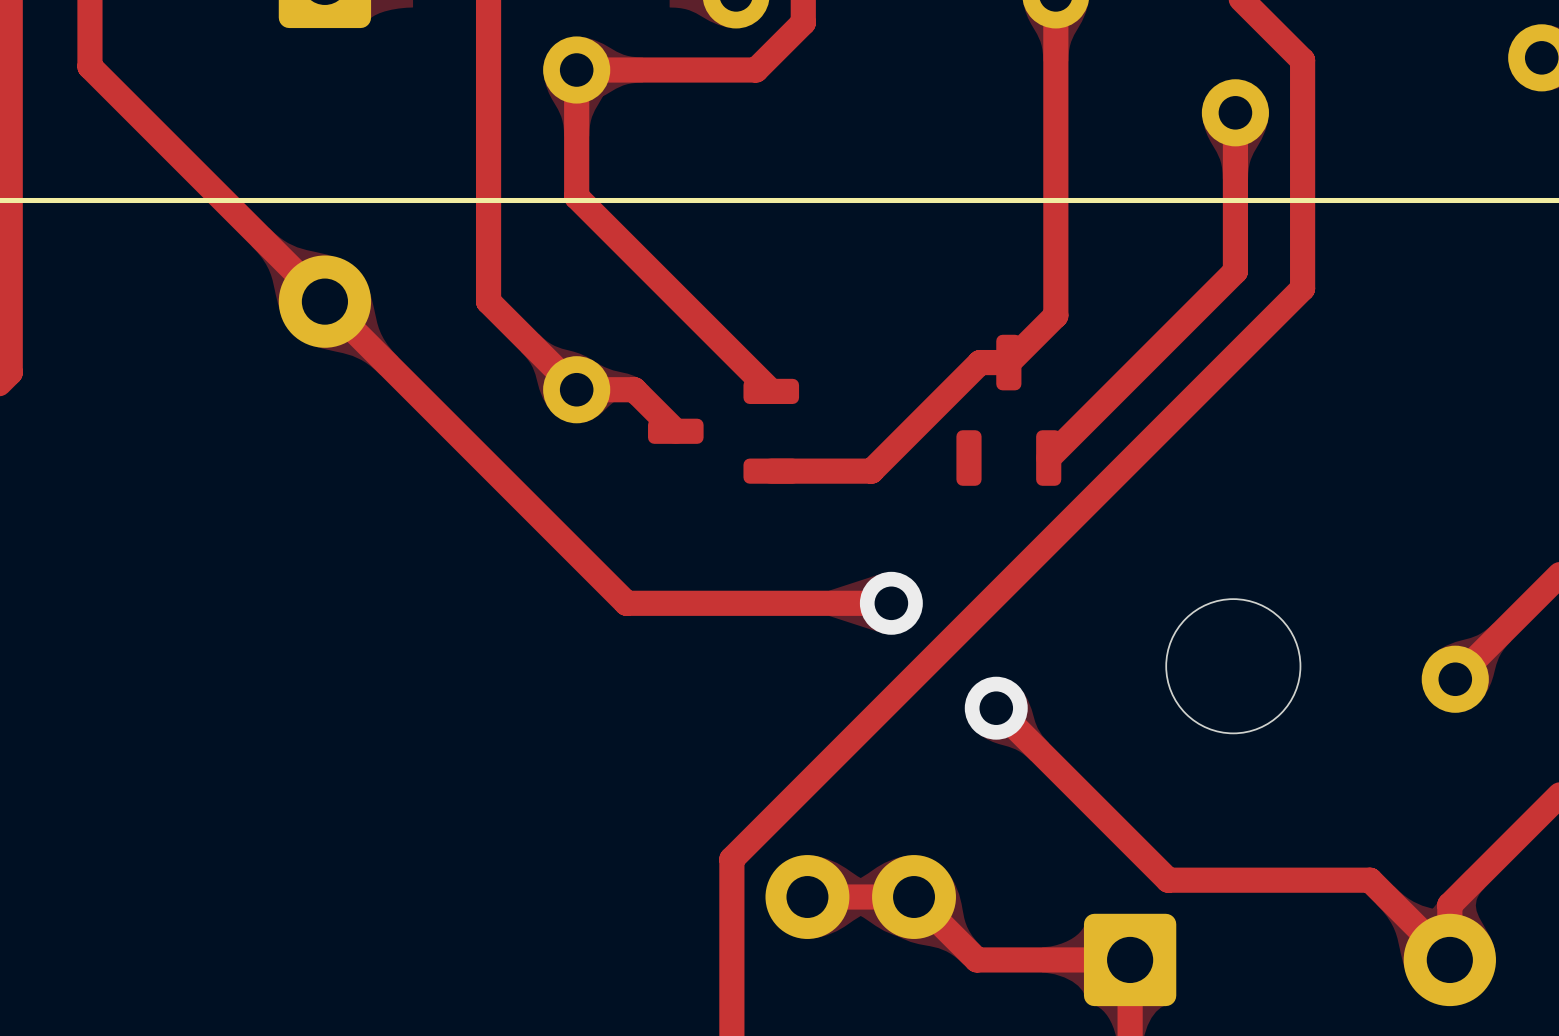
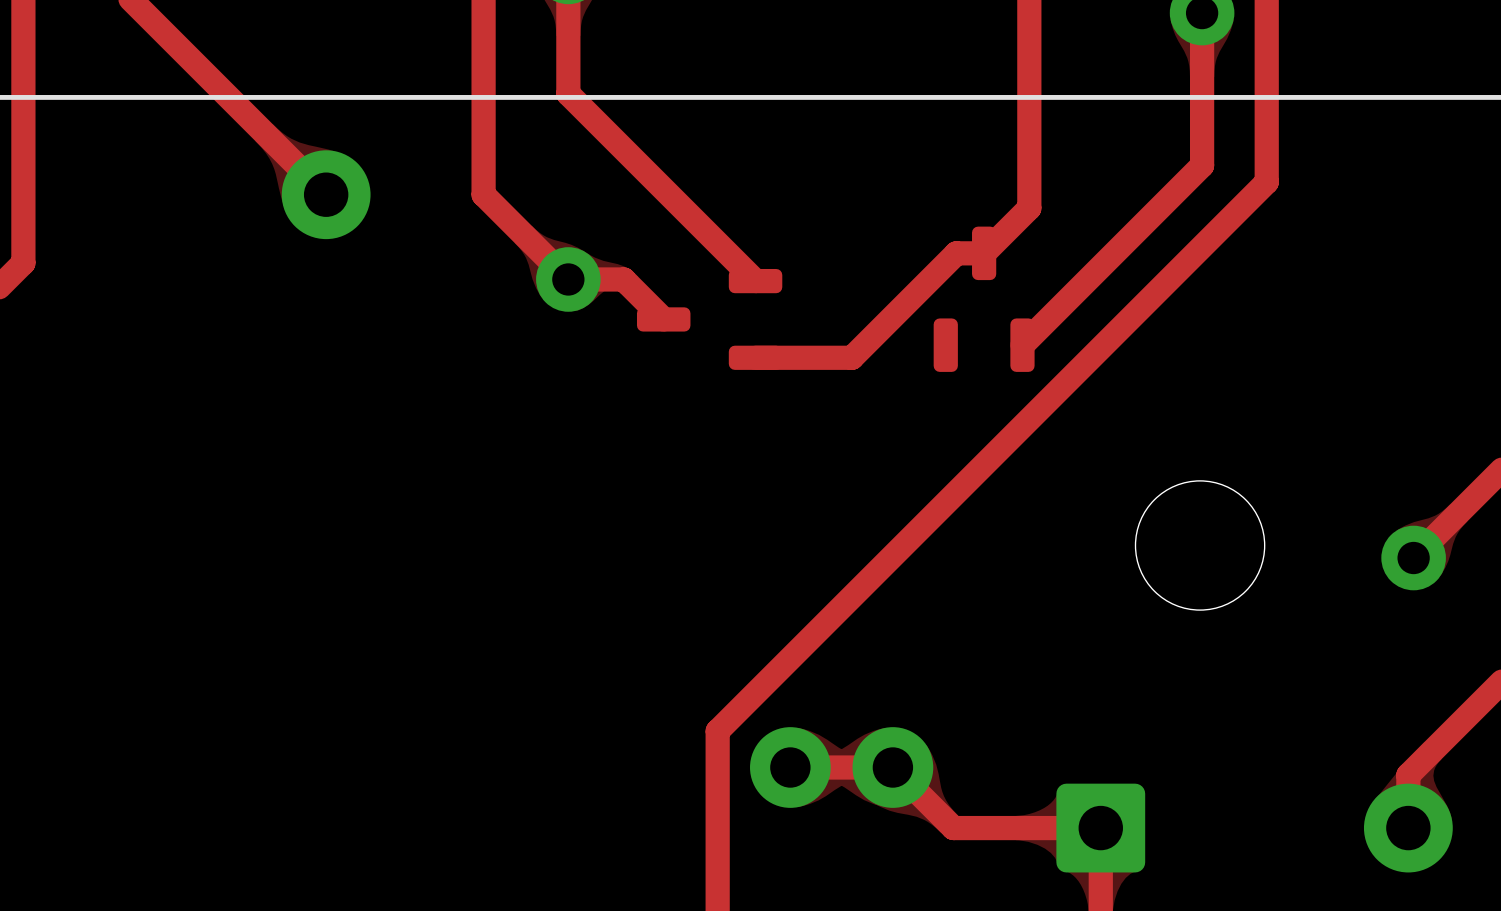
top track: (334, 311) (626, 603) (891, 603) -> none
via: (891, 603) -> none
top track: (996, 708) (1168, 880) (1370, 880) (1449, 959) -> none
via: (996, 708) -> none

